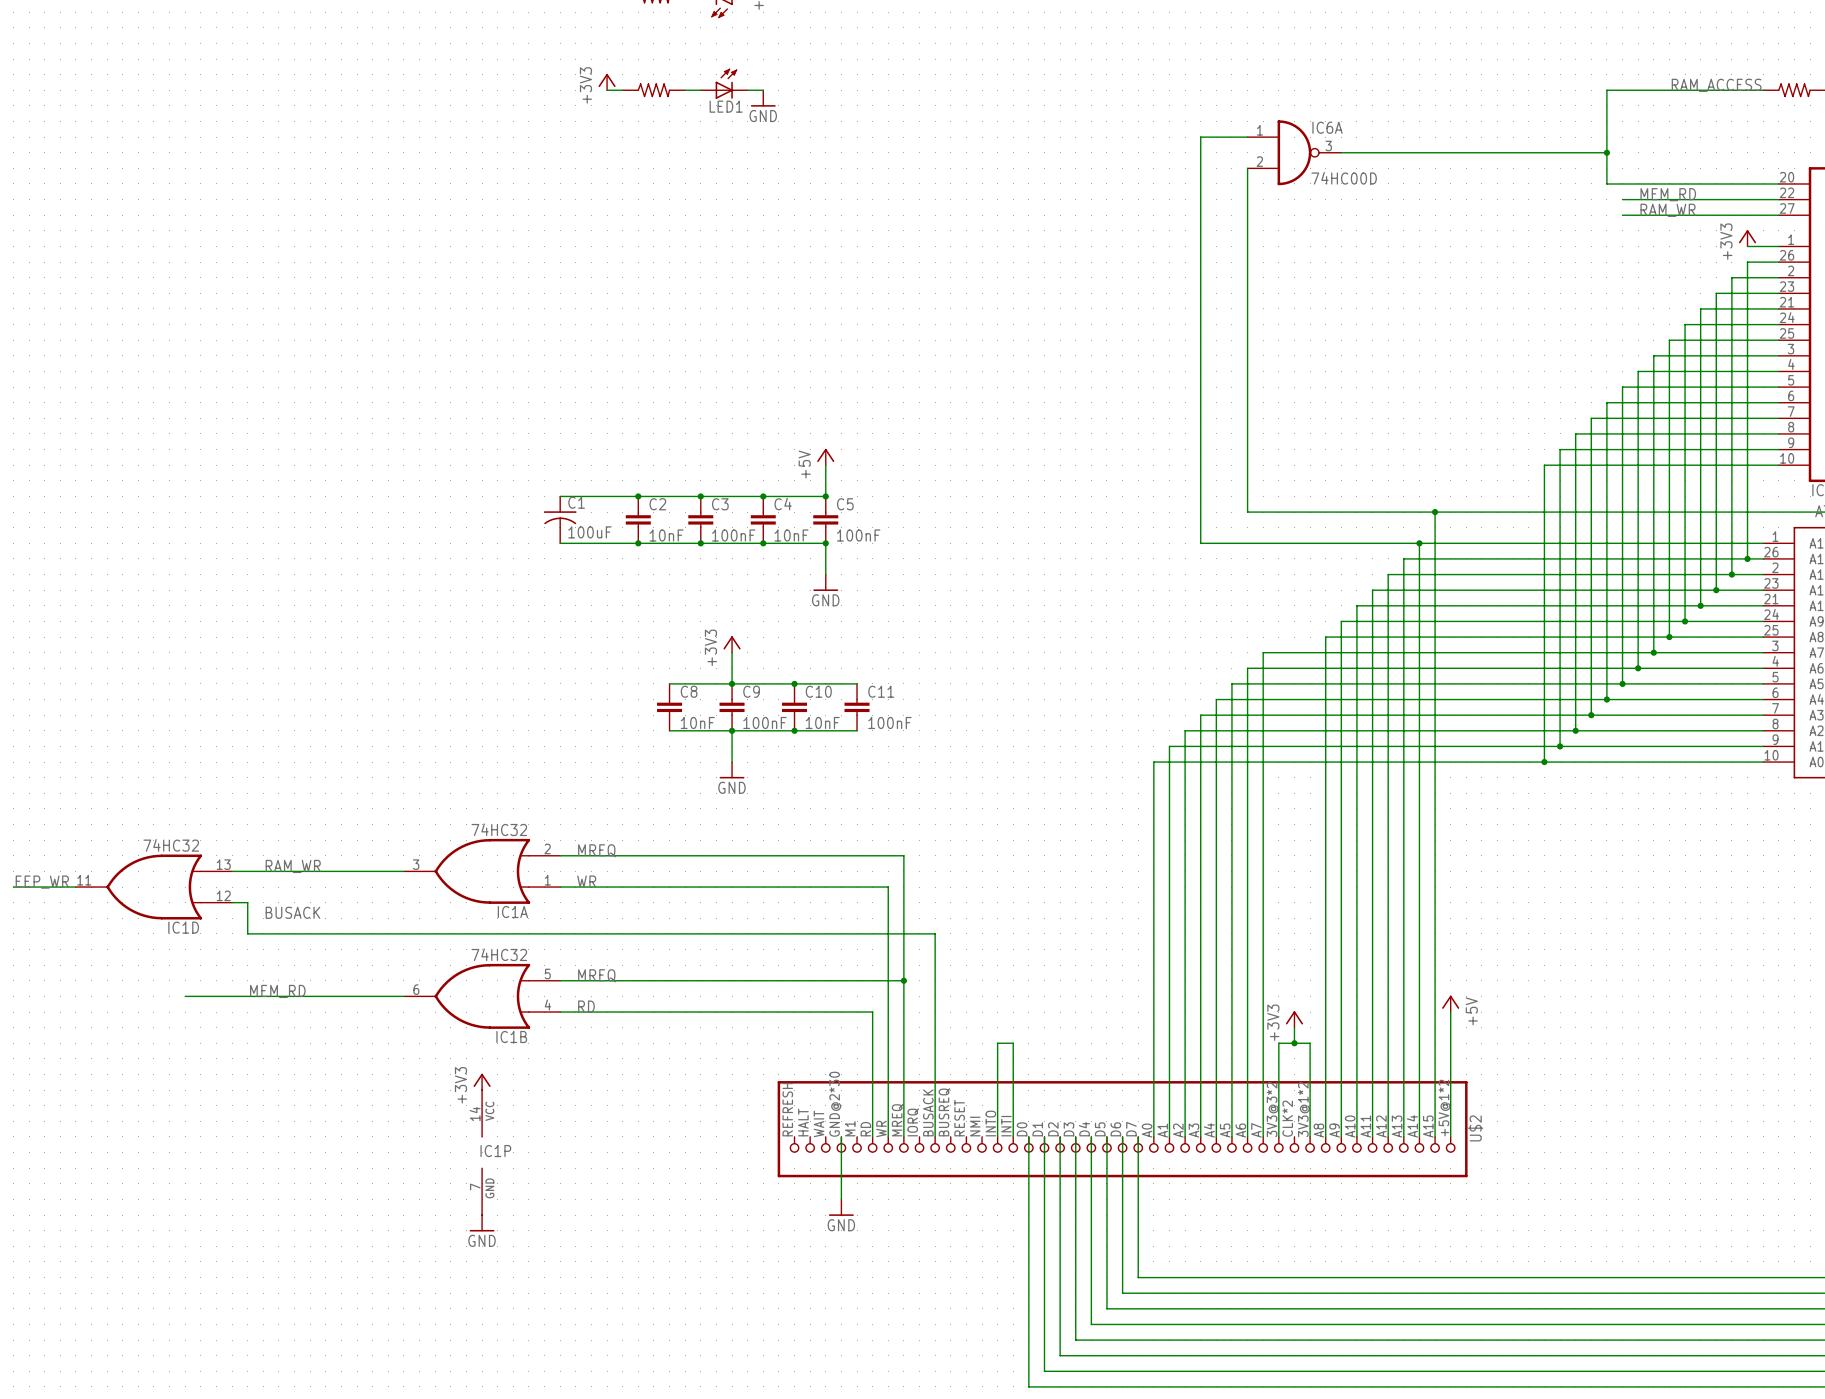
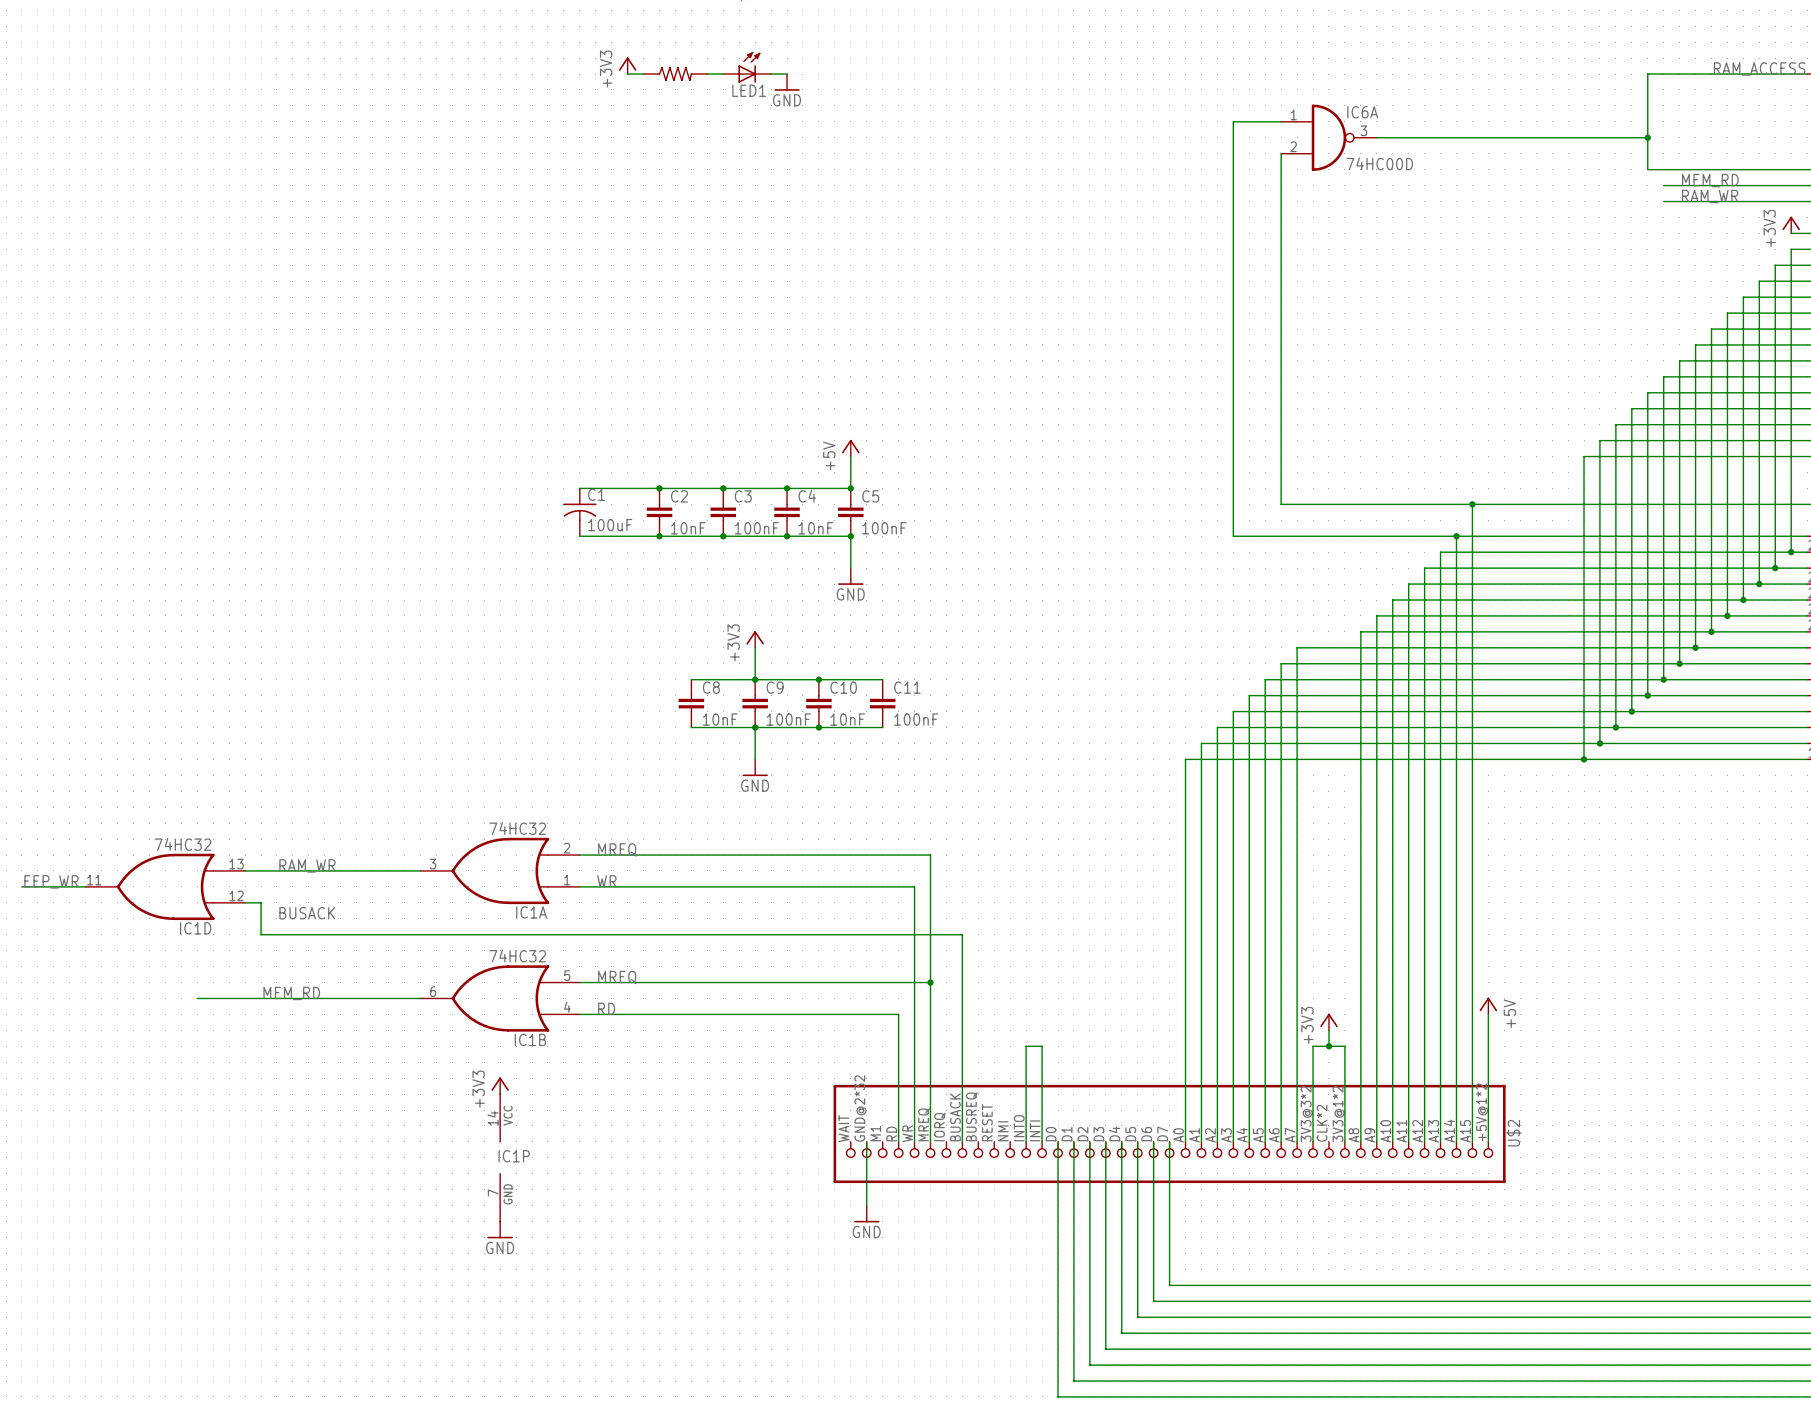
U$2 symbol: [777, 1081, 1468, 1178] -> [833, 1084, 1506, 1184]

